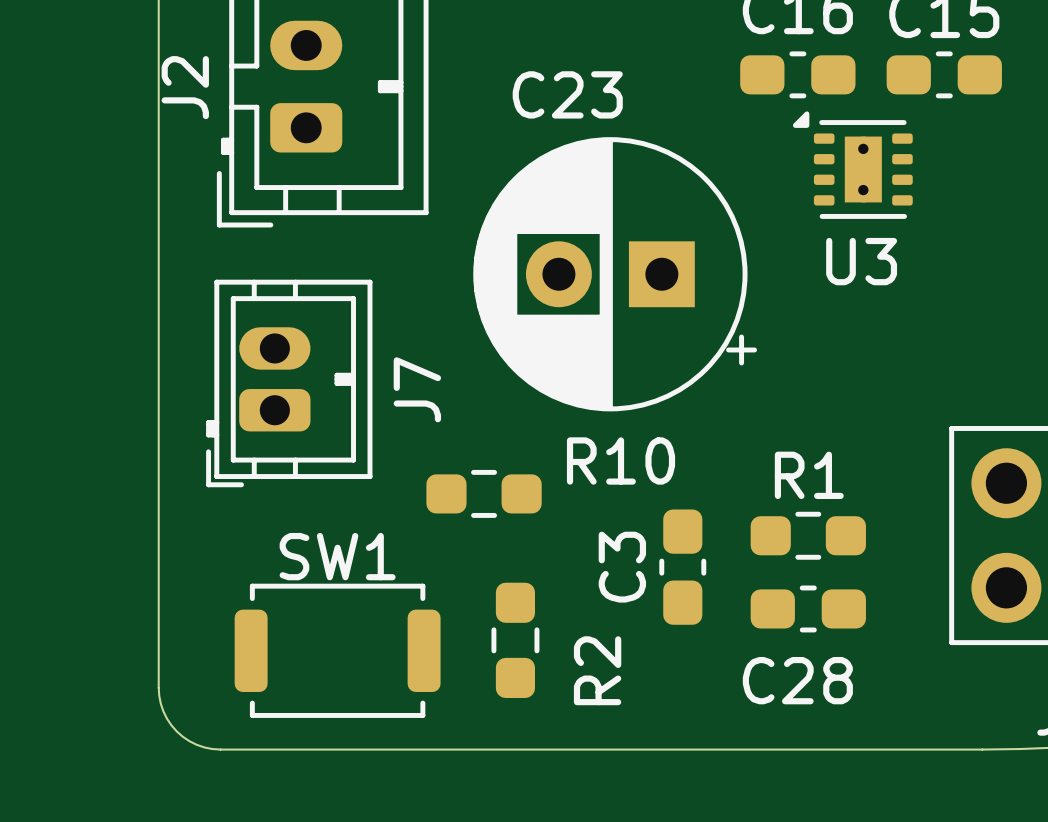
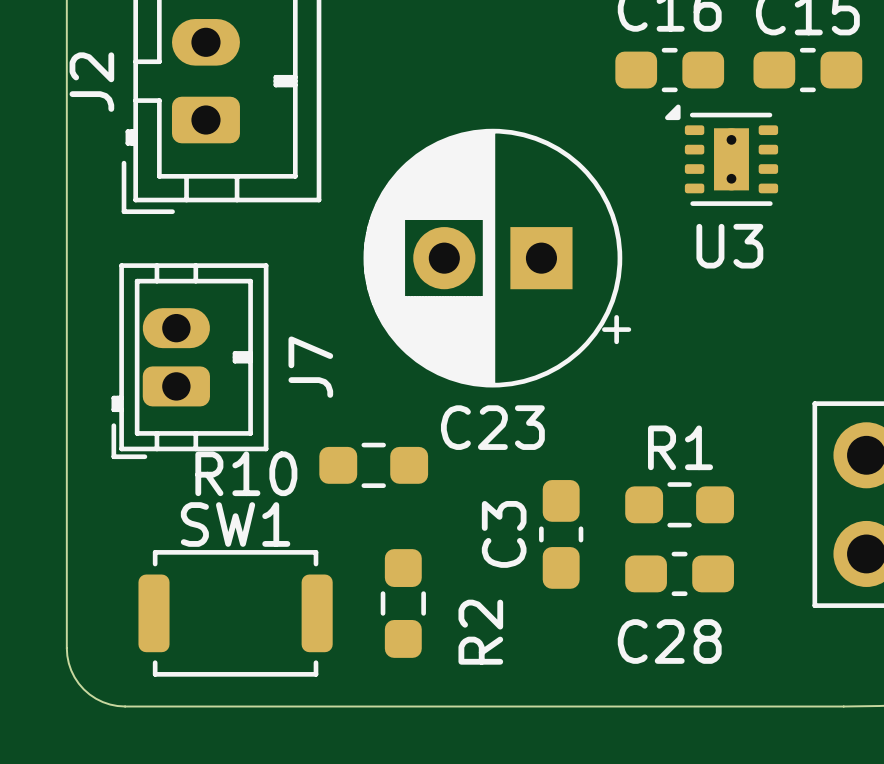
C23 name position: C23 (567, 94) -> C23 (492, 427)
R10 name position: R10 (621, 460) -> R10 (246, 473)

